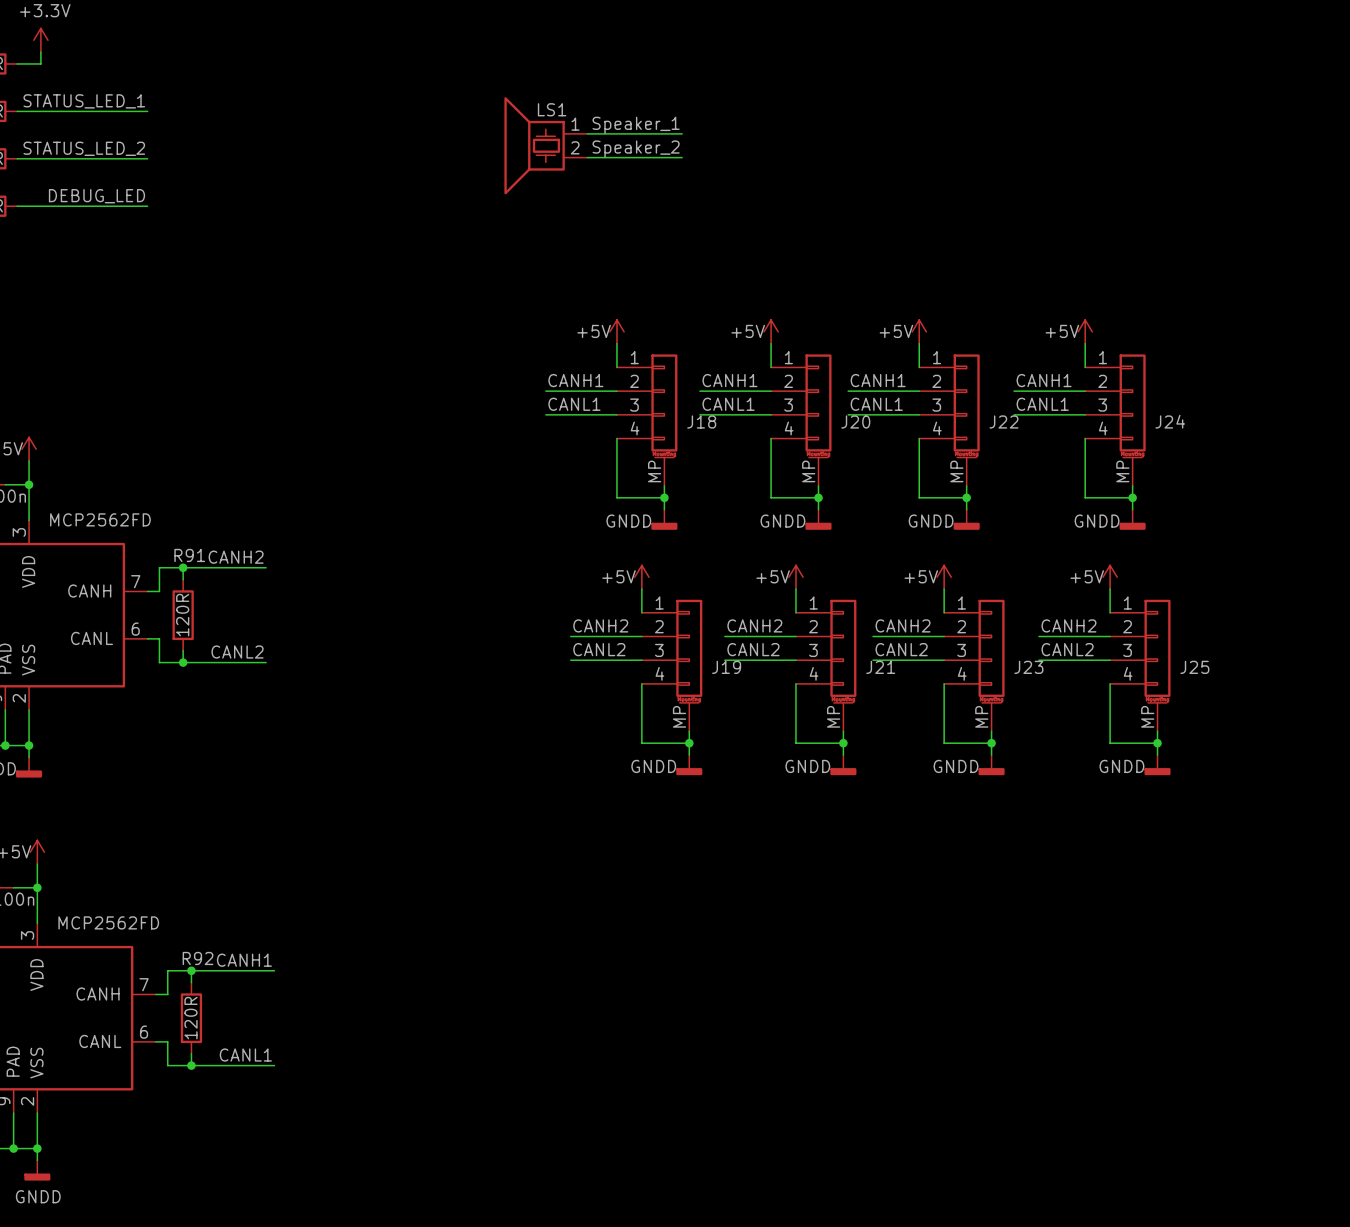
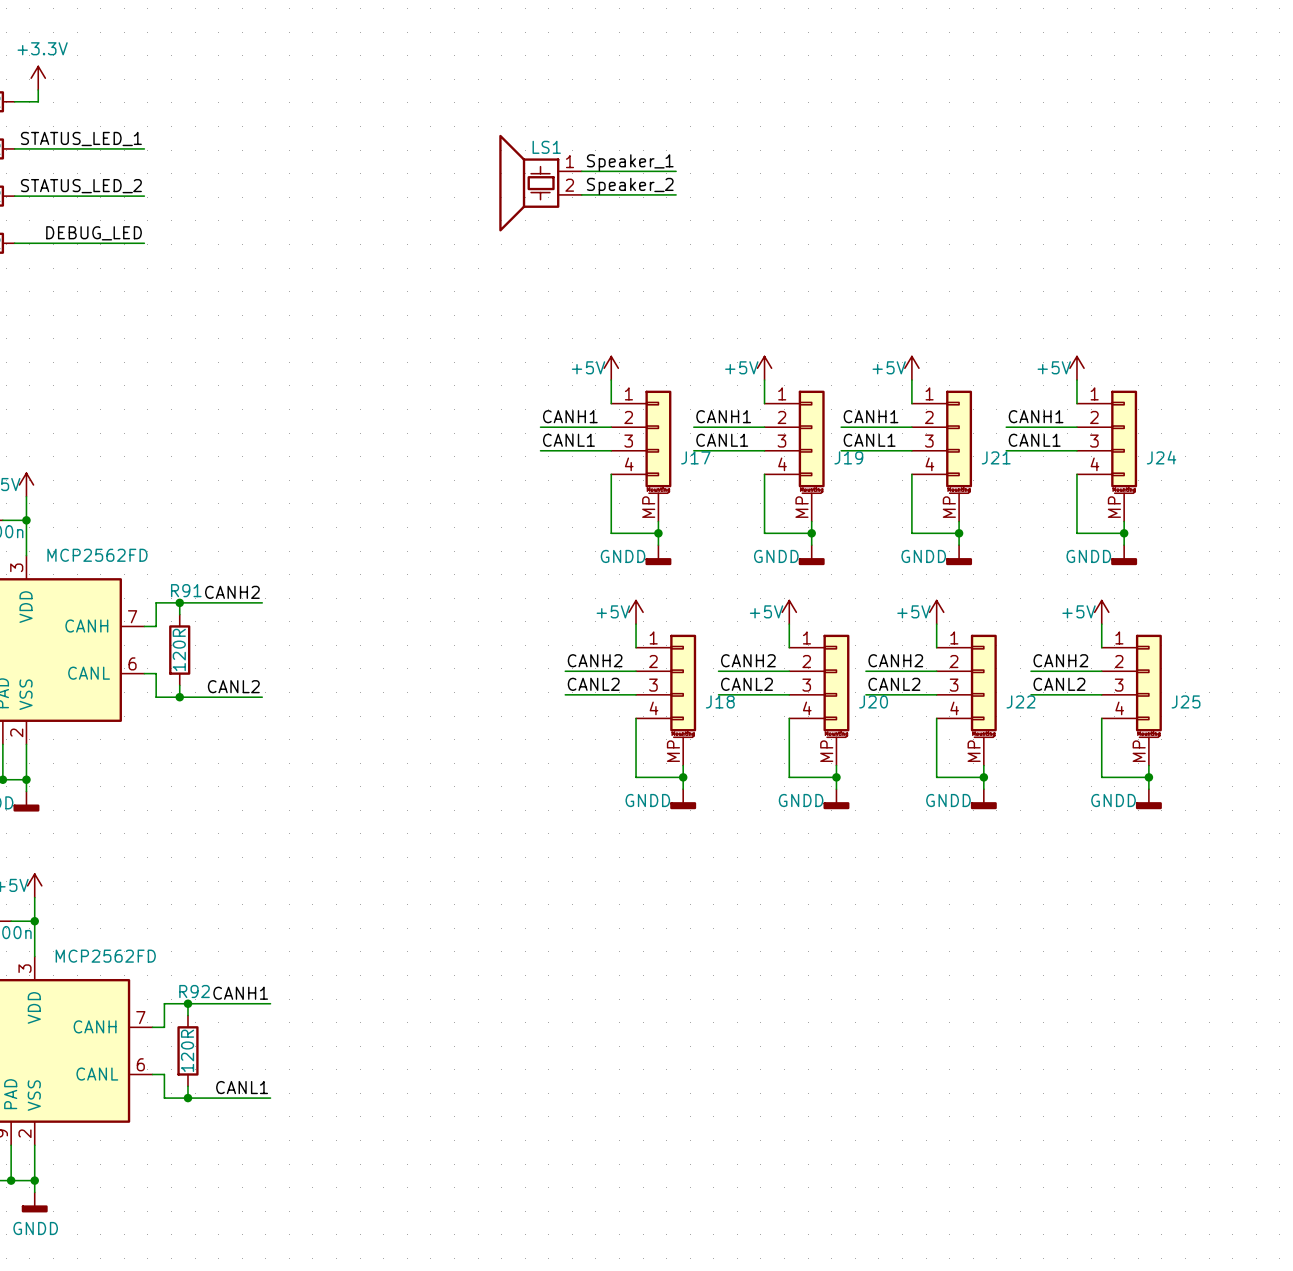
J18 name: J18 (701, 421) -> J17 (695, 457)
J20 name: J20 (855, 421) -> J19 (848, 457)
J22 name: J22 (1003, 421) -> J21 (996, 457)
J19 name: J19 (726, 667) -> J18 (720, 701)
J21 name: J21 (880, 667) -> J20 (873, 701)
J23 name: J23 (1028, 667) -> J22 (1020, 701)

